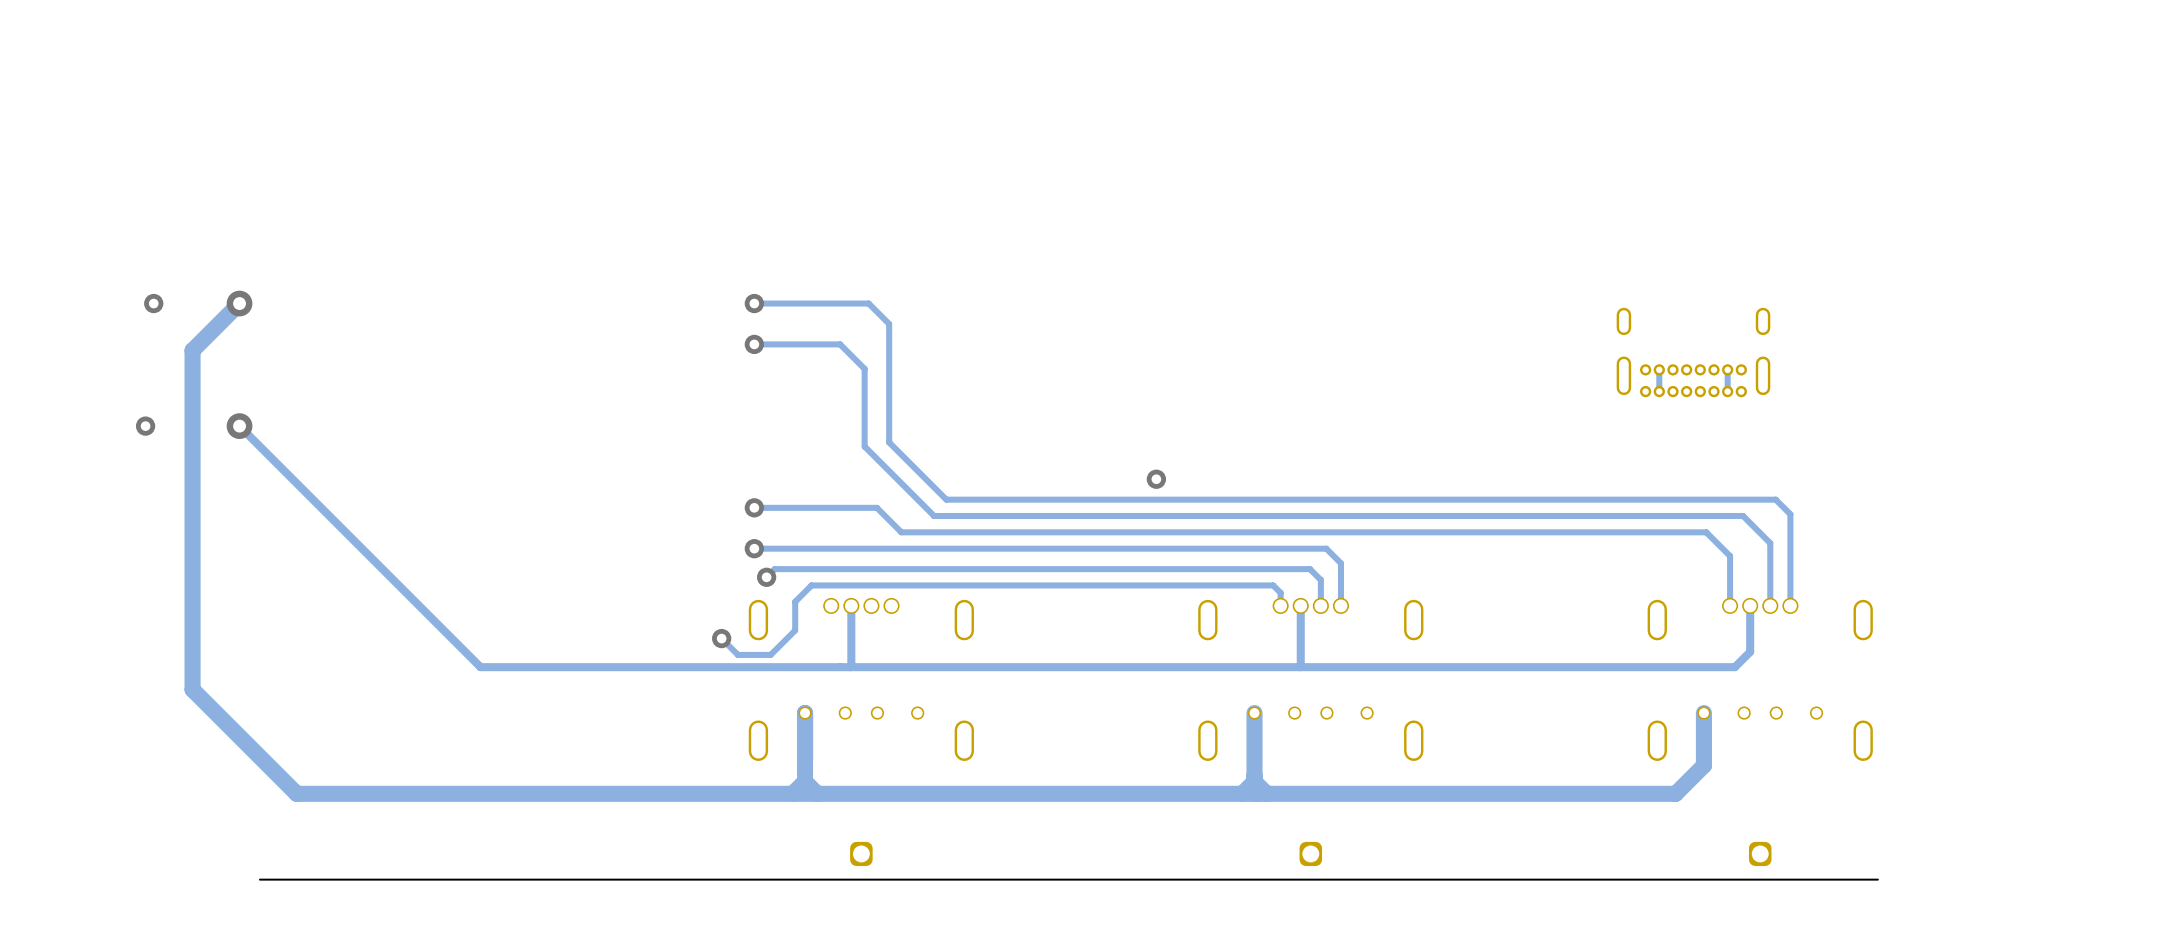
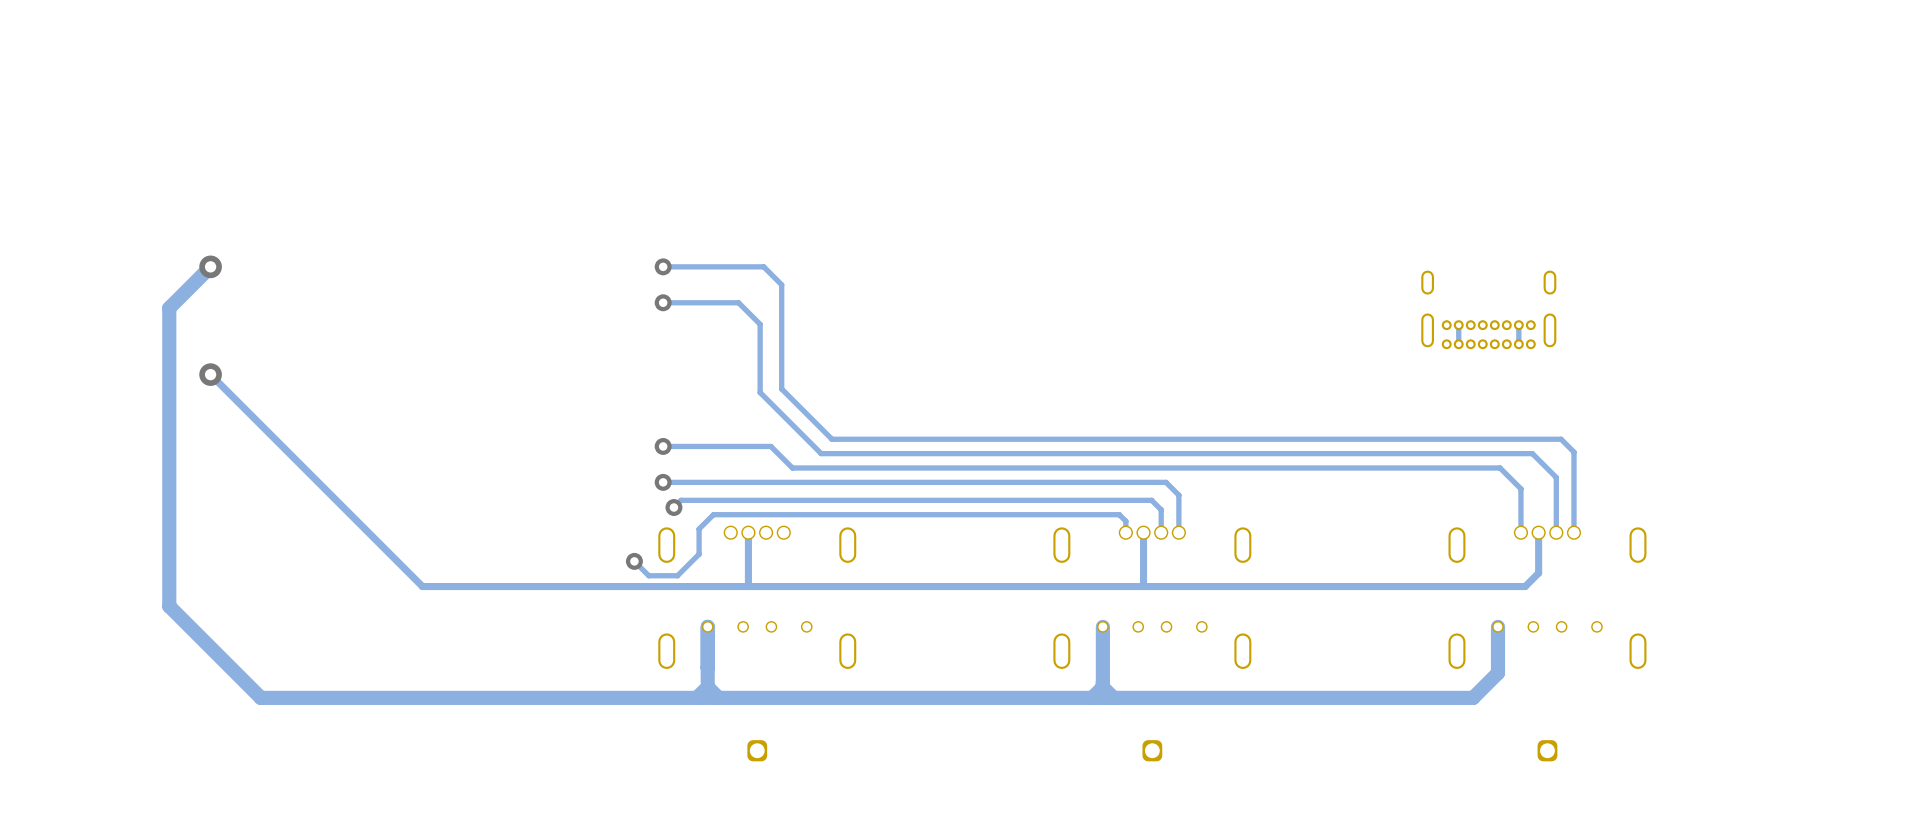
via: (153, 303) -> none
via: (145, 426) -> none
via: (1156, 479) -> none
board edge: (1877, 879) (259, 879) -> none

